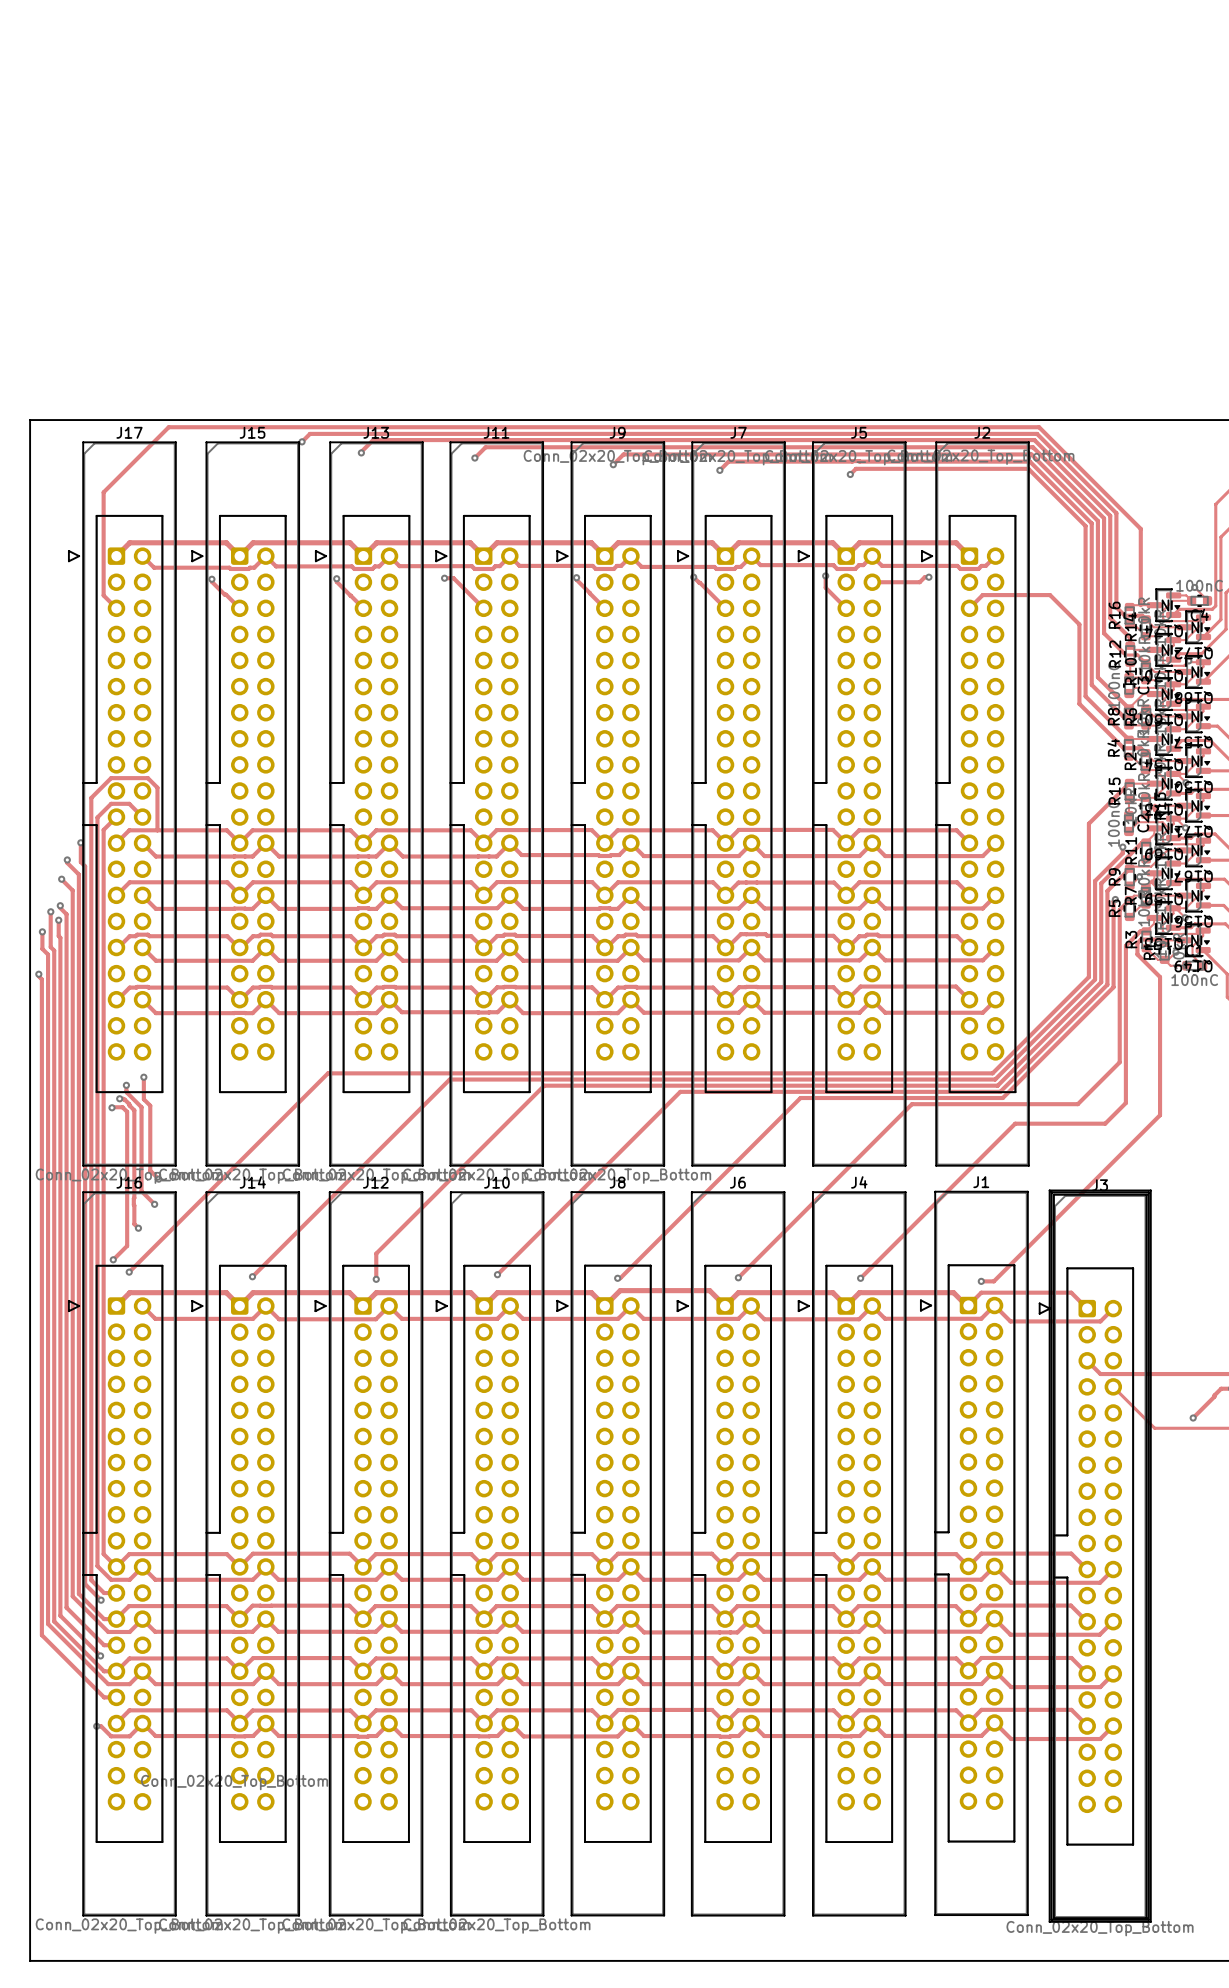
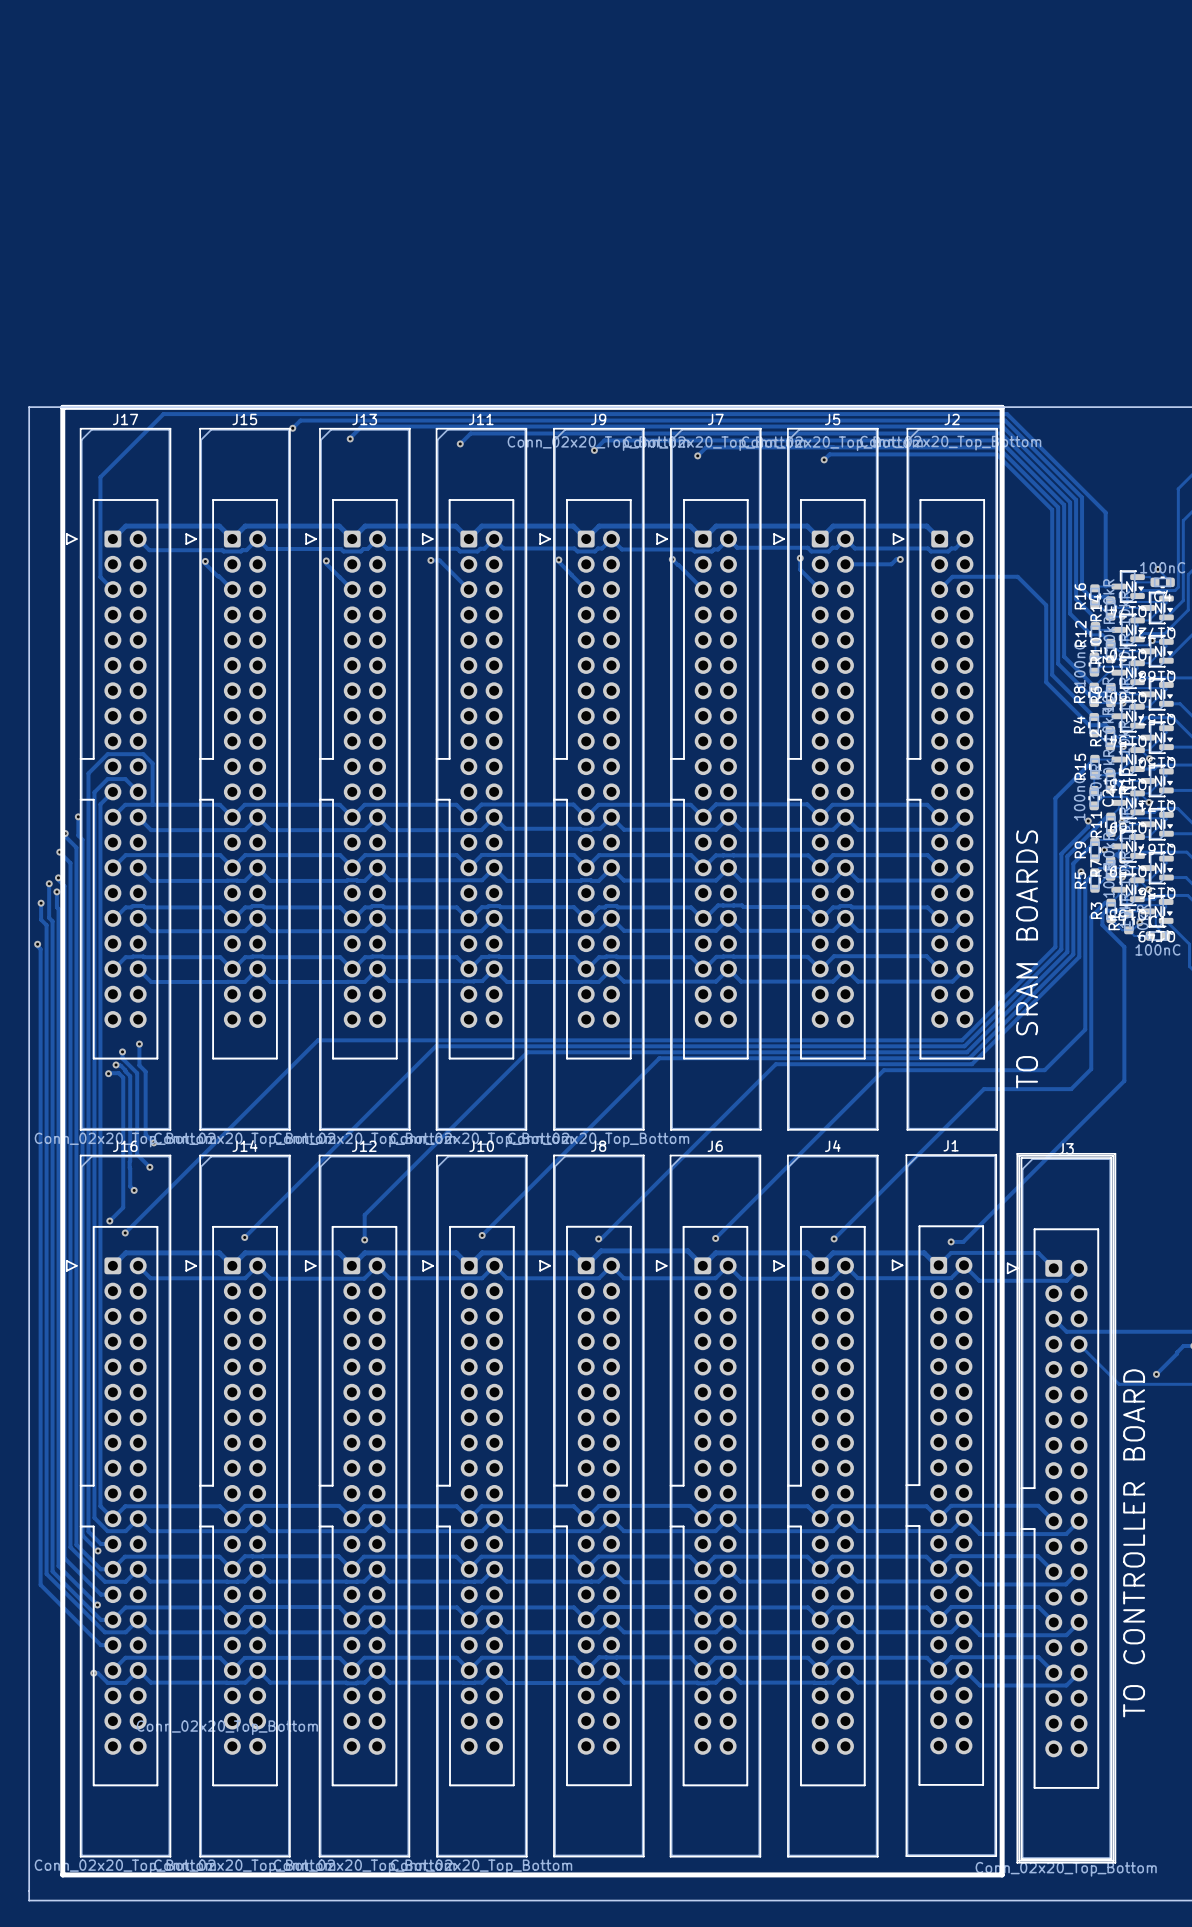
line: none -> (62, 407) (1002, 407) (1002, 1874) (62, 1874) (62, 407)
text: none -> TO SRAM BOARDS (1027, 959)
text: none -> TO CONTROLLER BOARD (1134, 1543)

